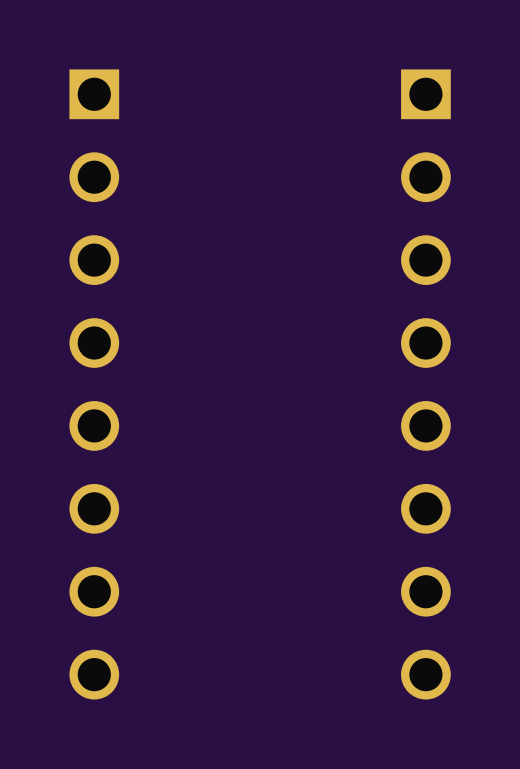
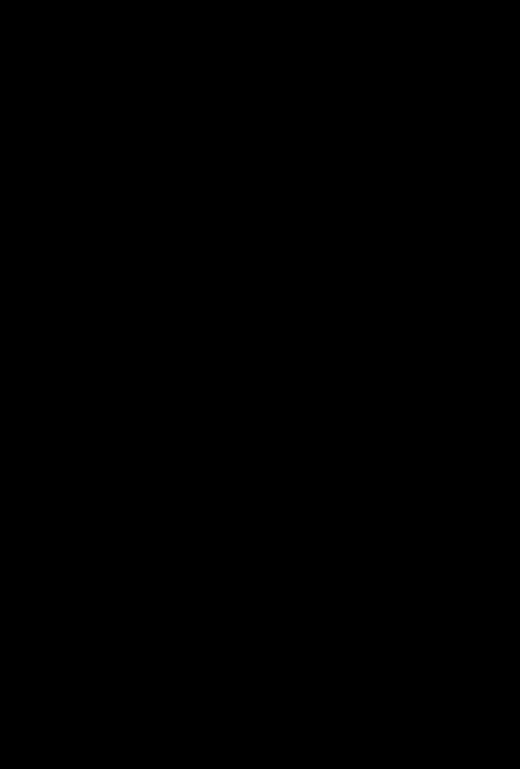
part: (94, 384) -> none
part: (425, 384) -> none

